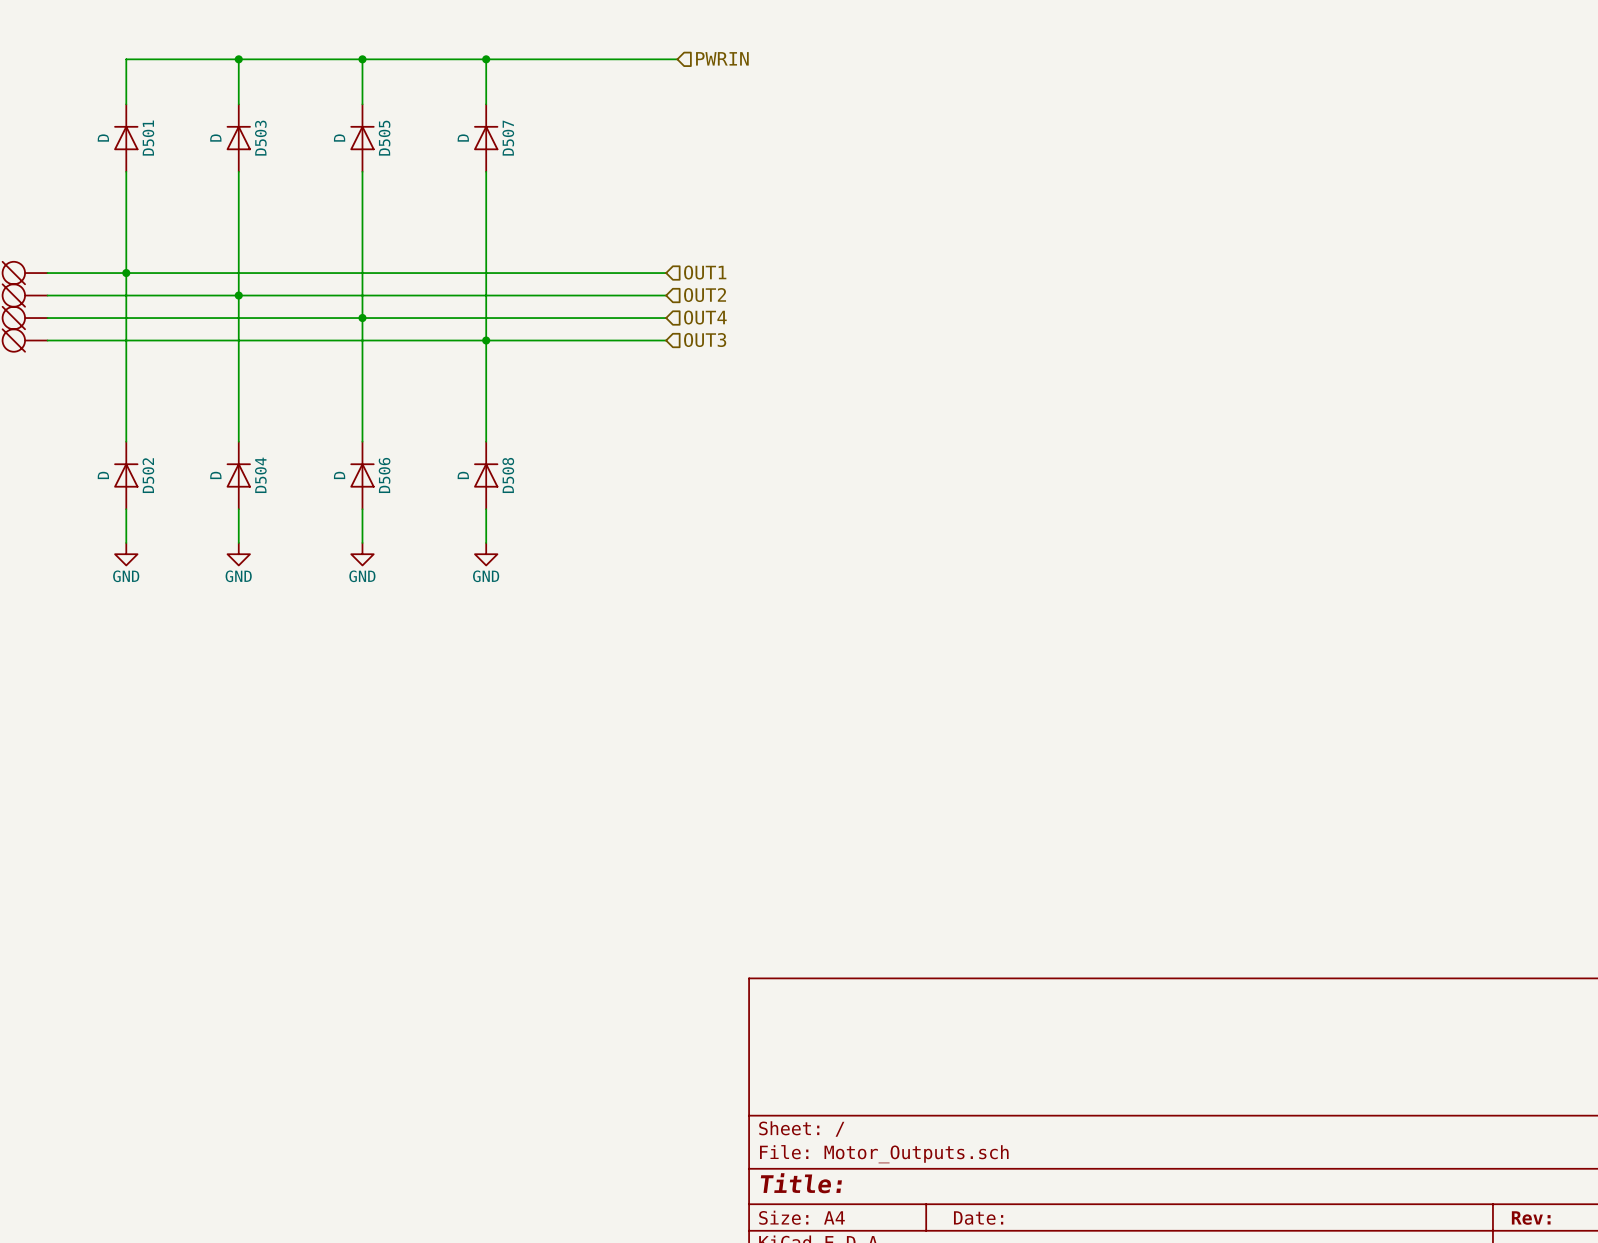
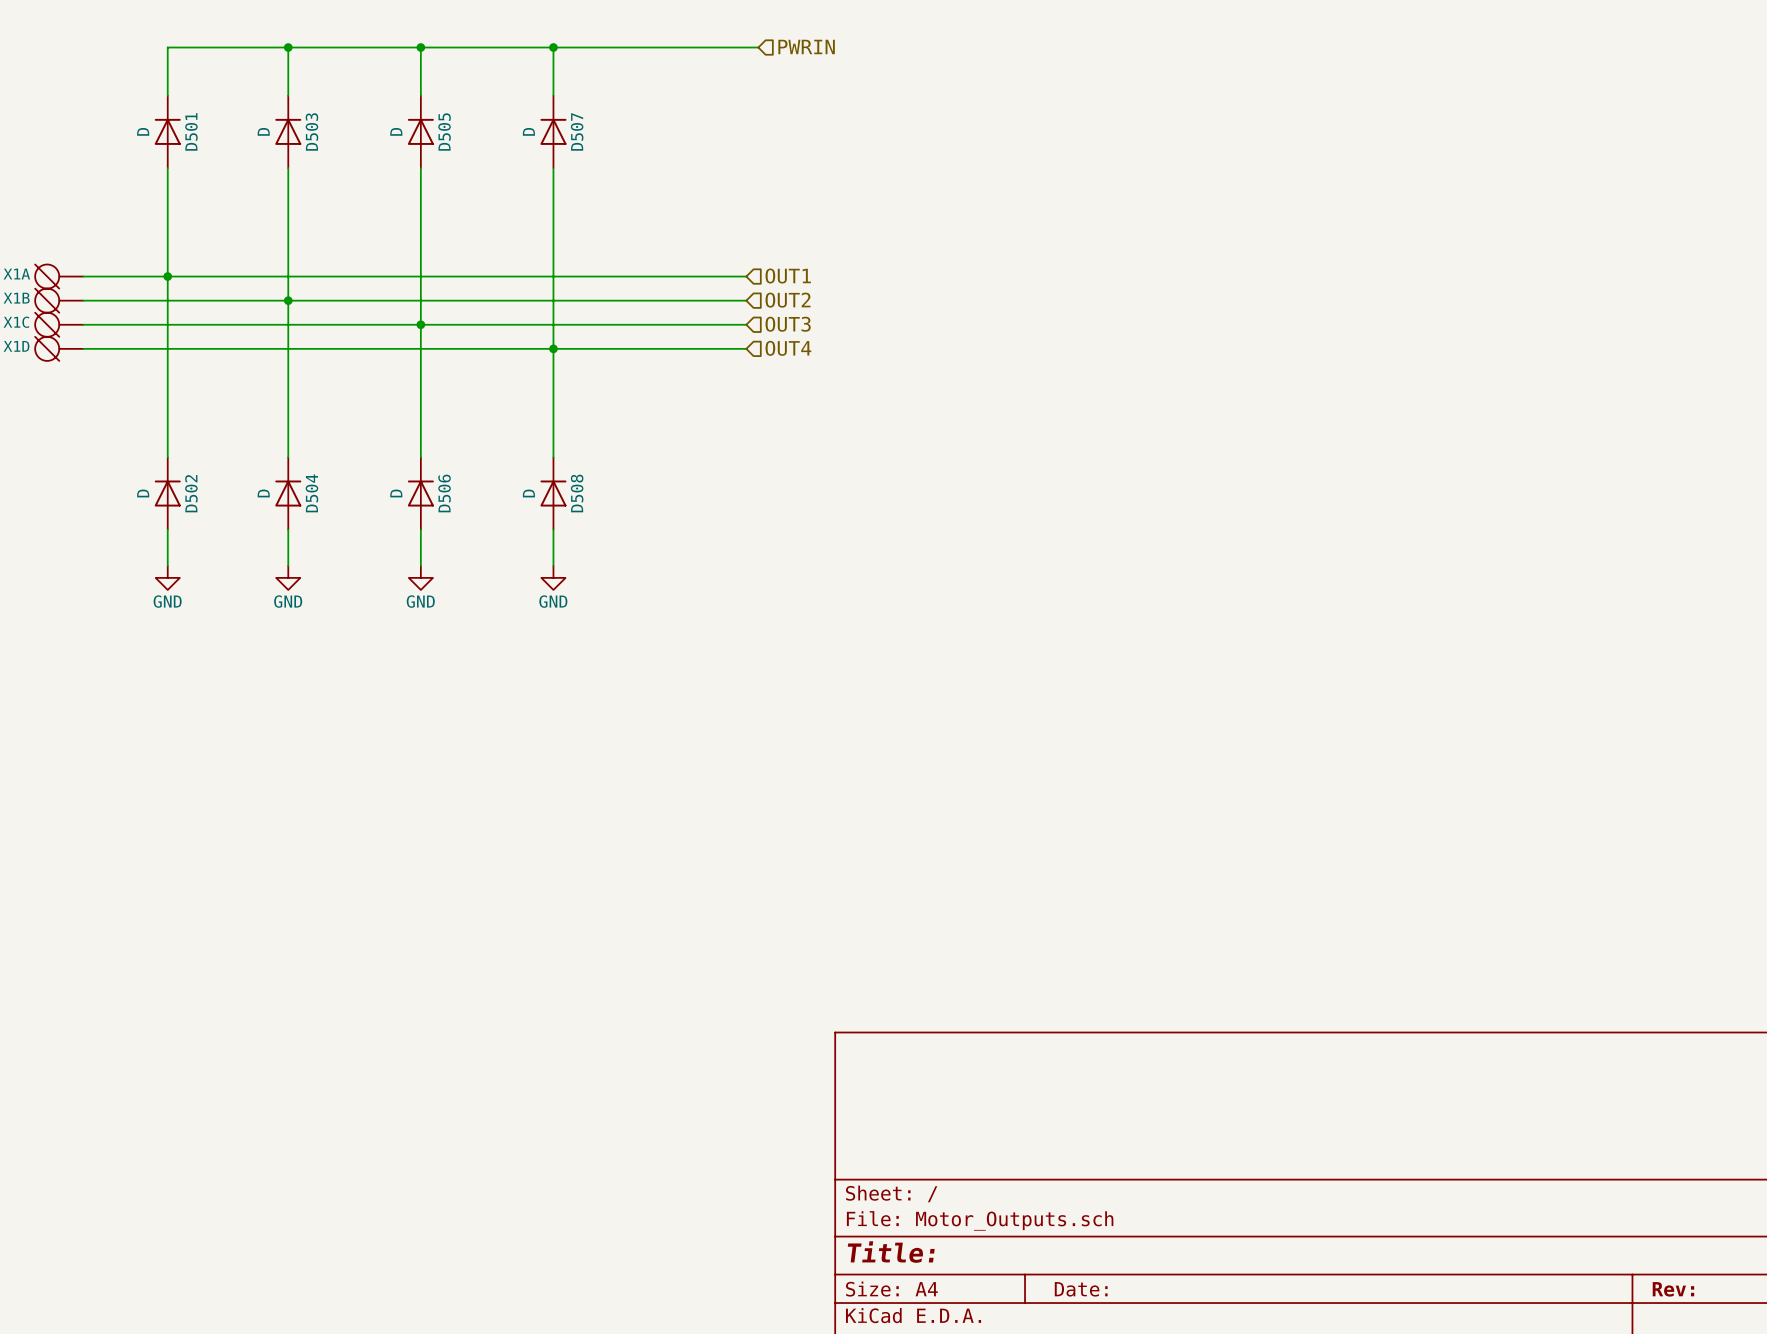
hierarchical label: OUT4 (705, 317) -> OUT3 (788, 324)
hierarchical label: OUT3 (705, 340) -> OUT4 (788, 348)

